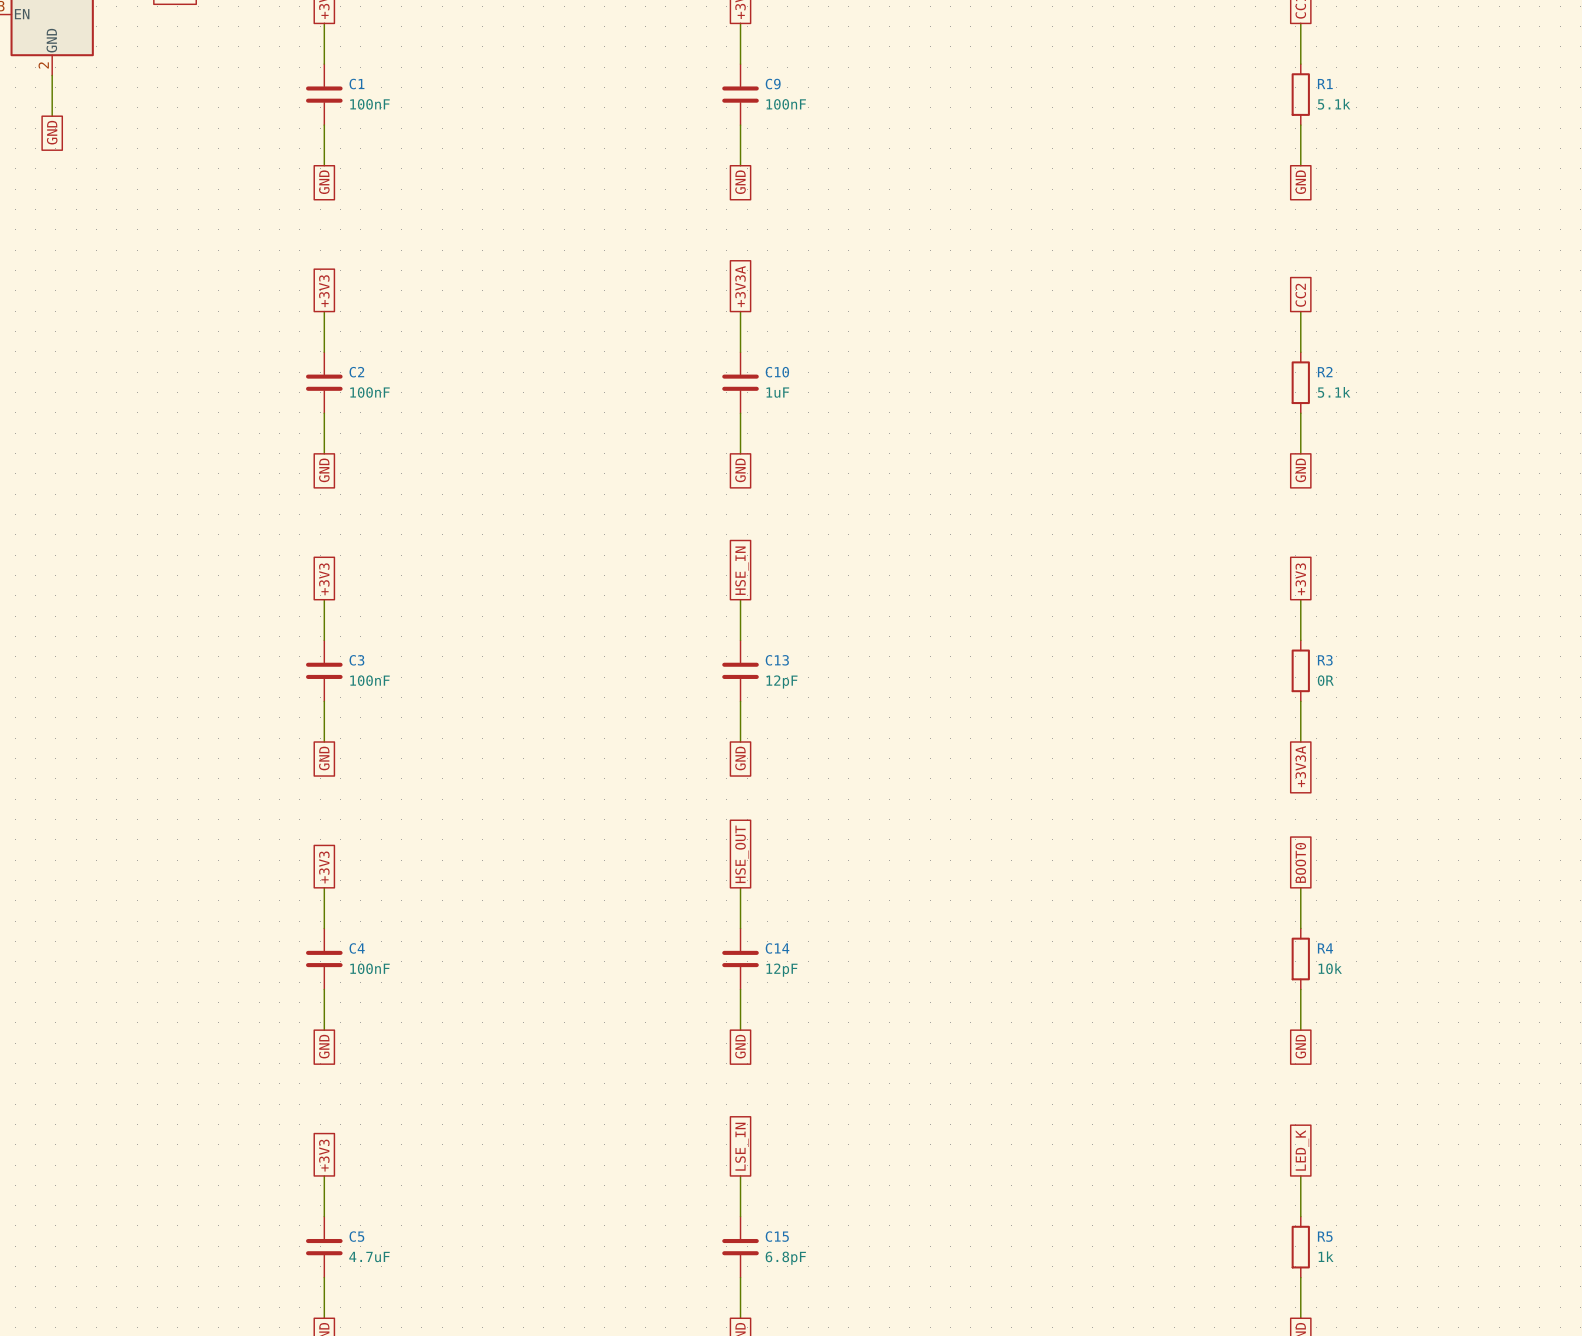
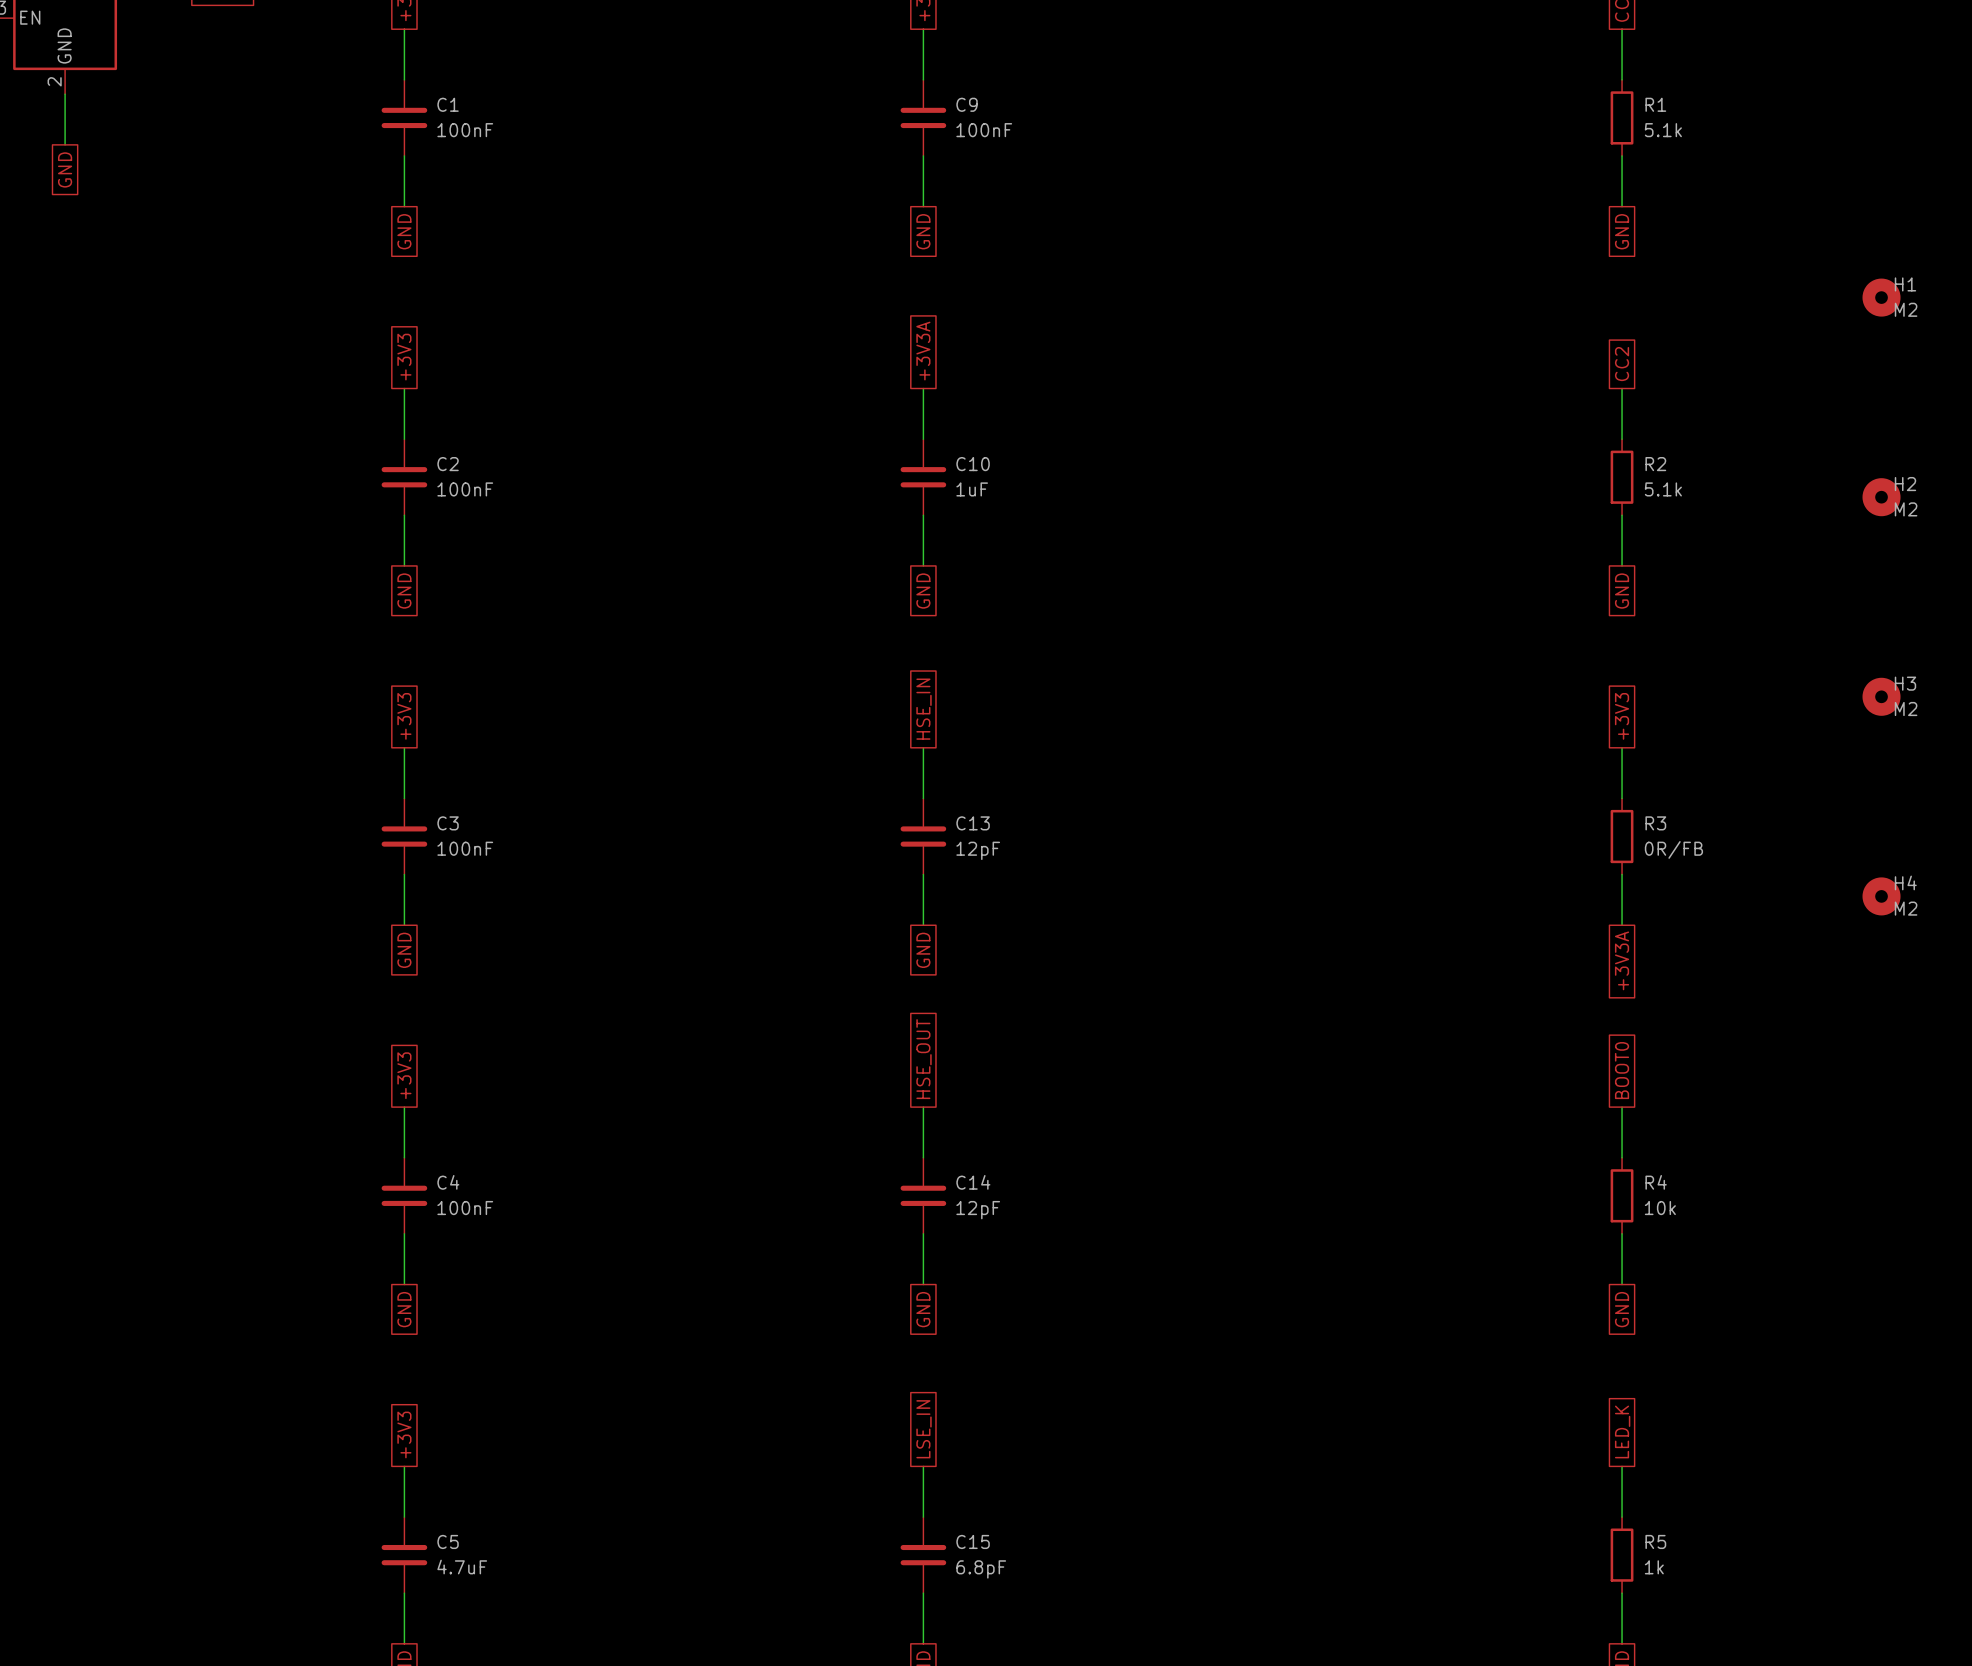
H1: none -> M2 (1881, 297)
H2: none -> M2 (1881, 497)
H3: none -> M2 (1881, 696)
R3 value: 0R (1325, 680) -> 0R/FB (1673, 849)
H4: none -> M2 (1881, 896)

